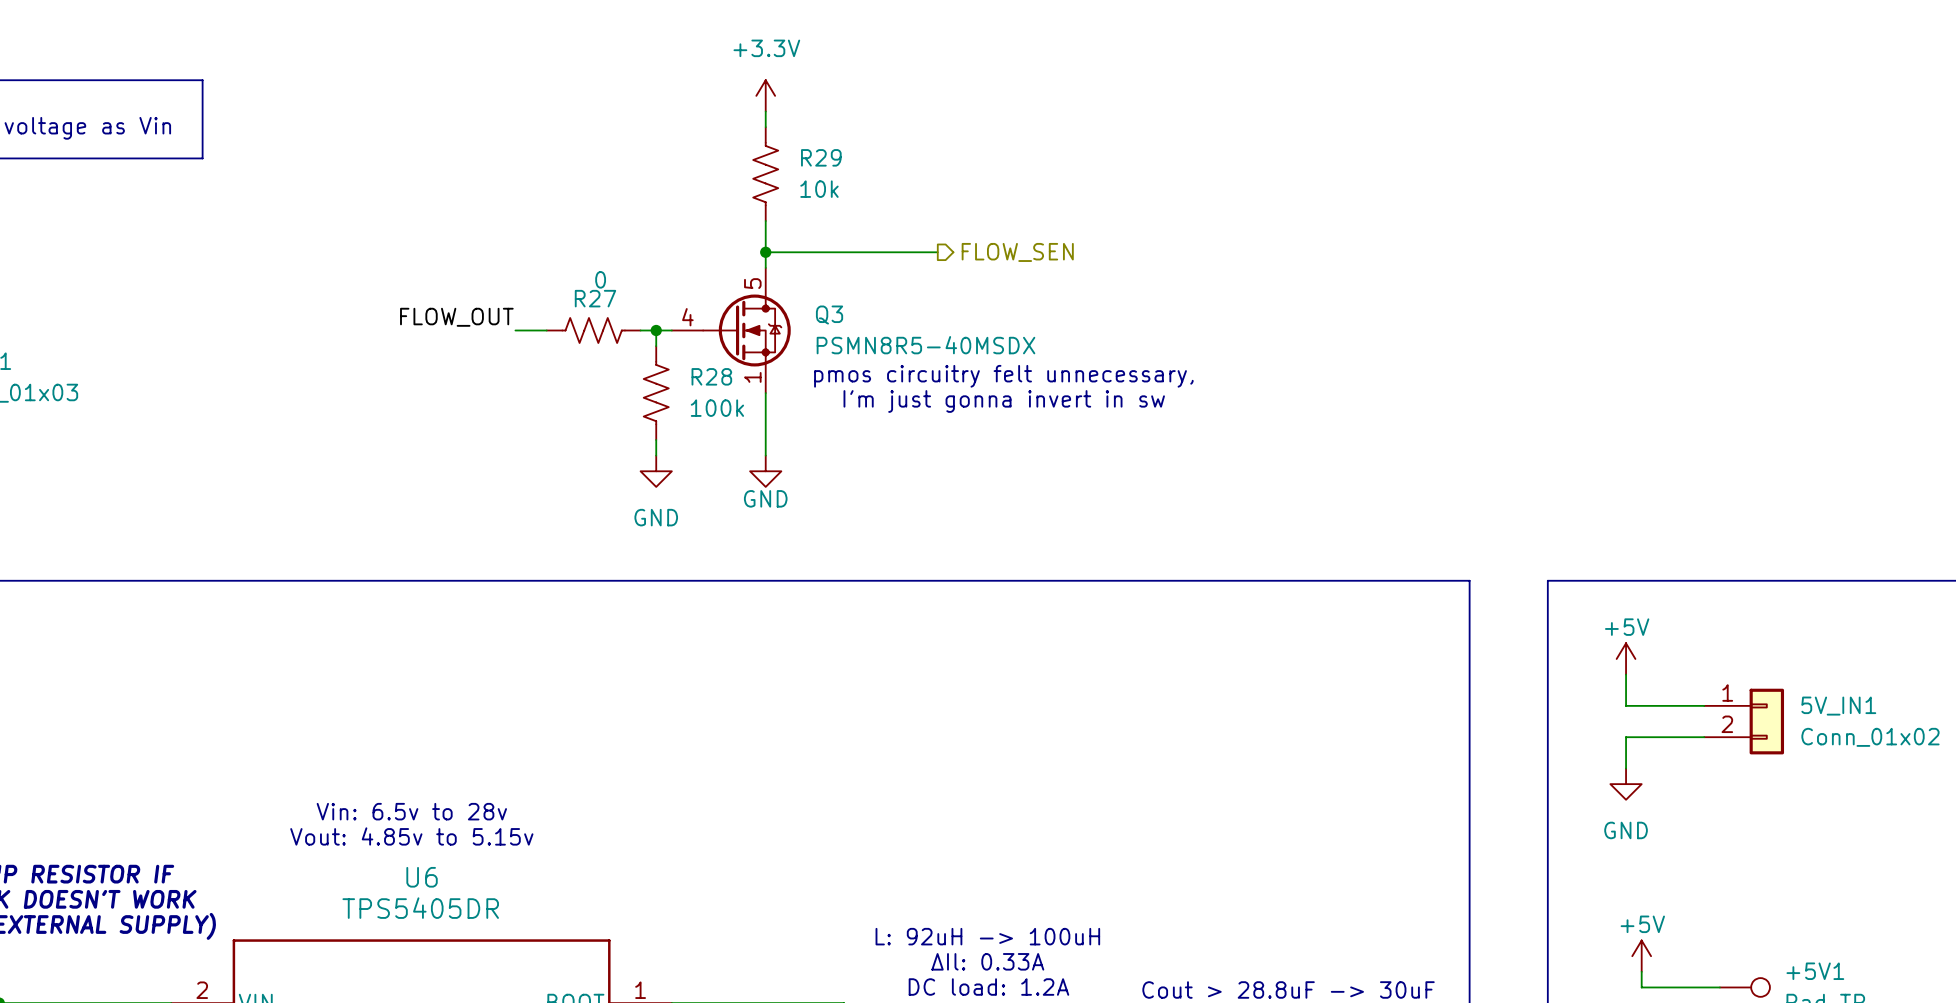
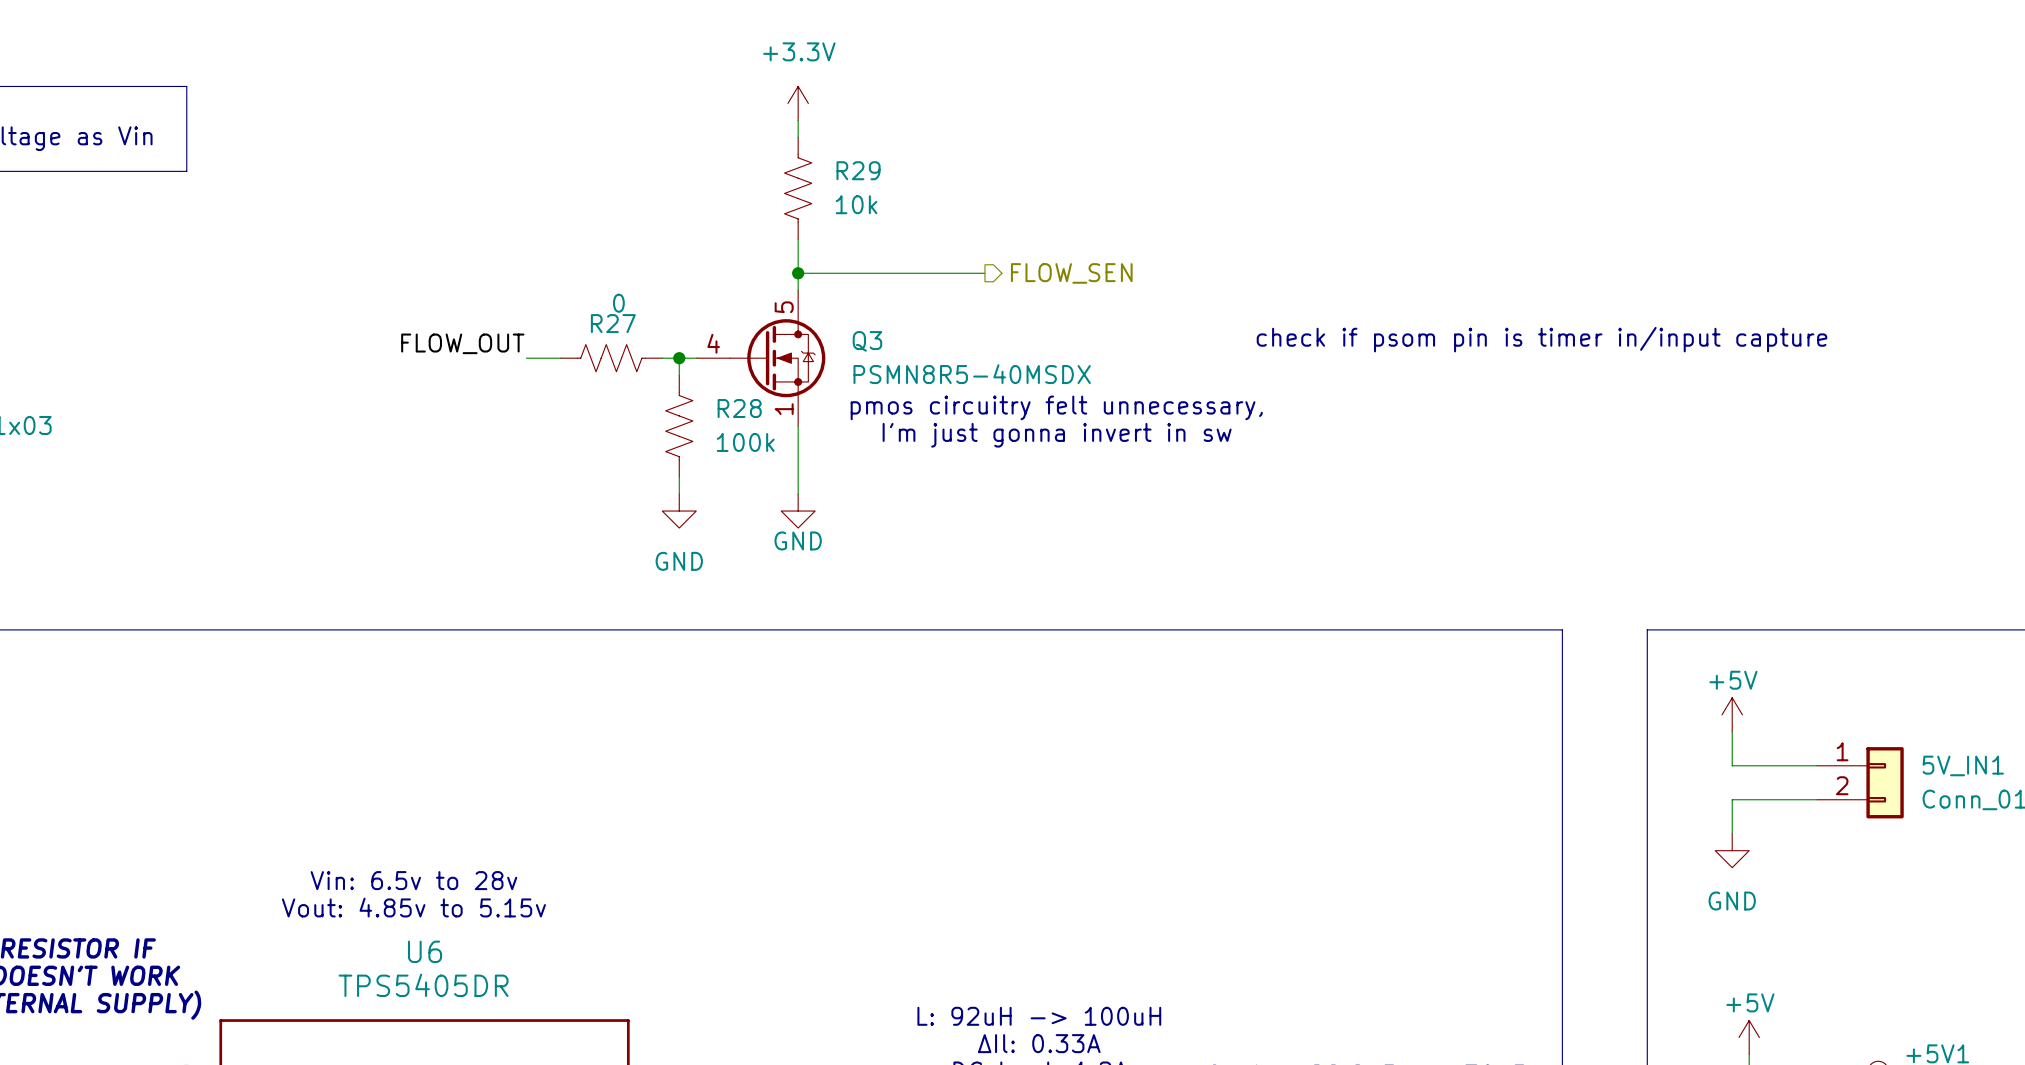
text: none -> check if psom pin is timer in/input capture (1542, 339)

